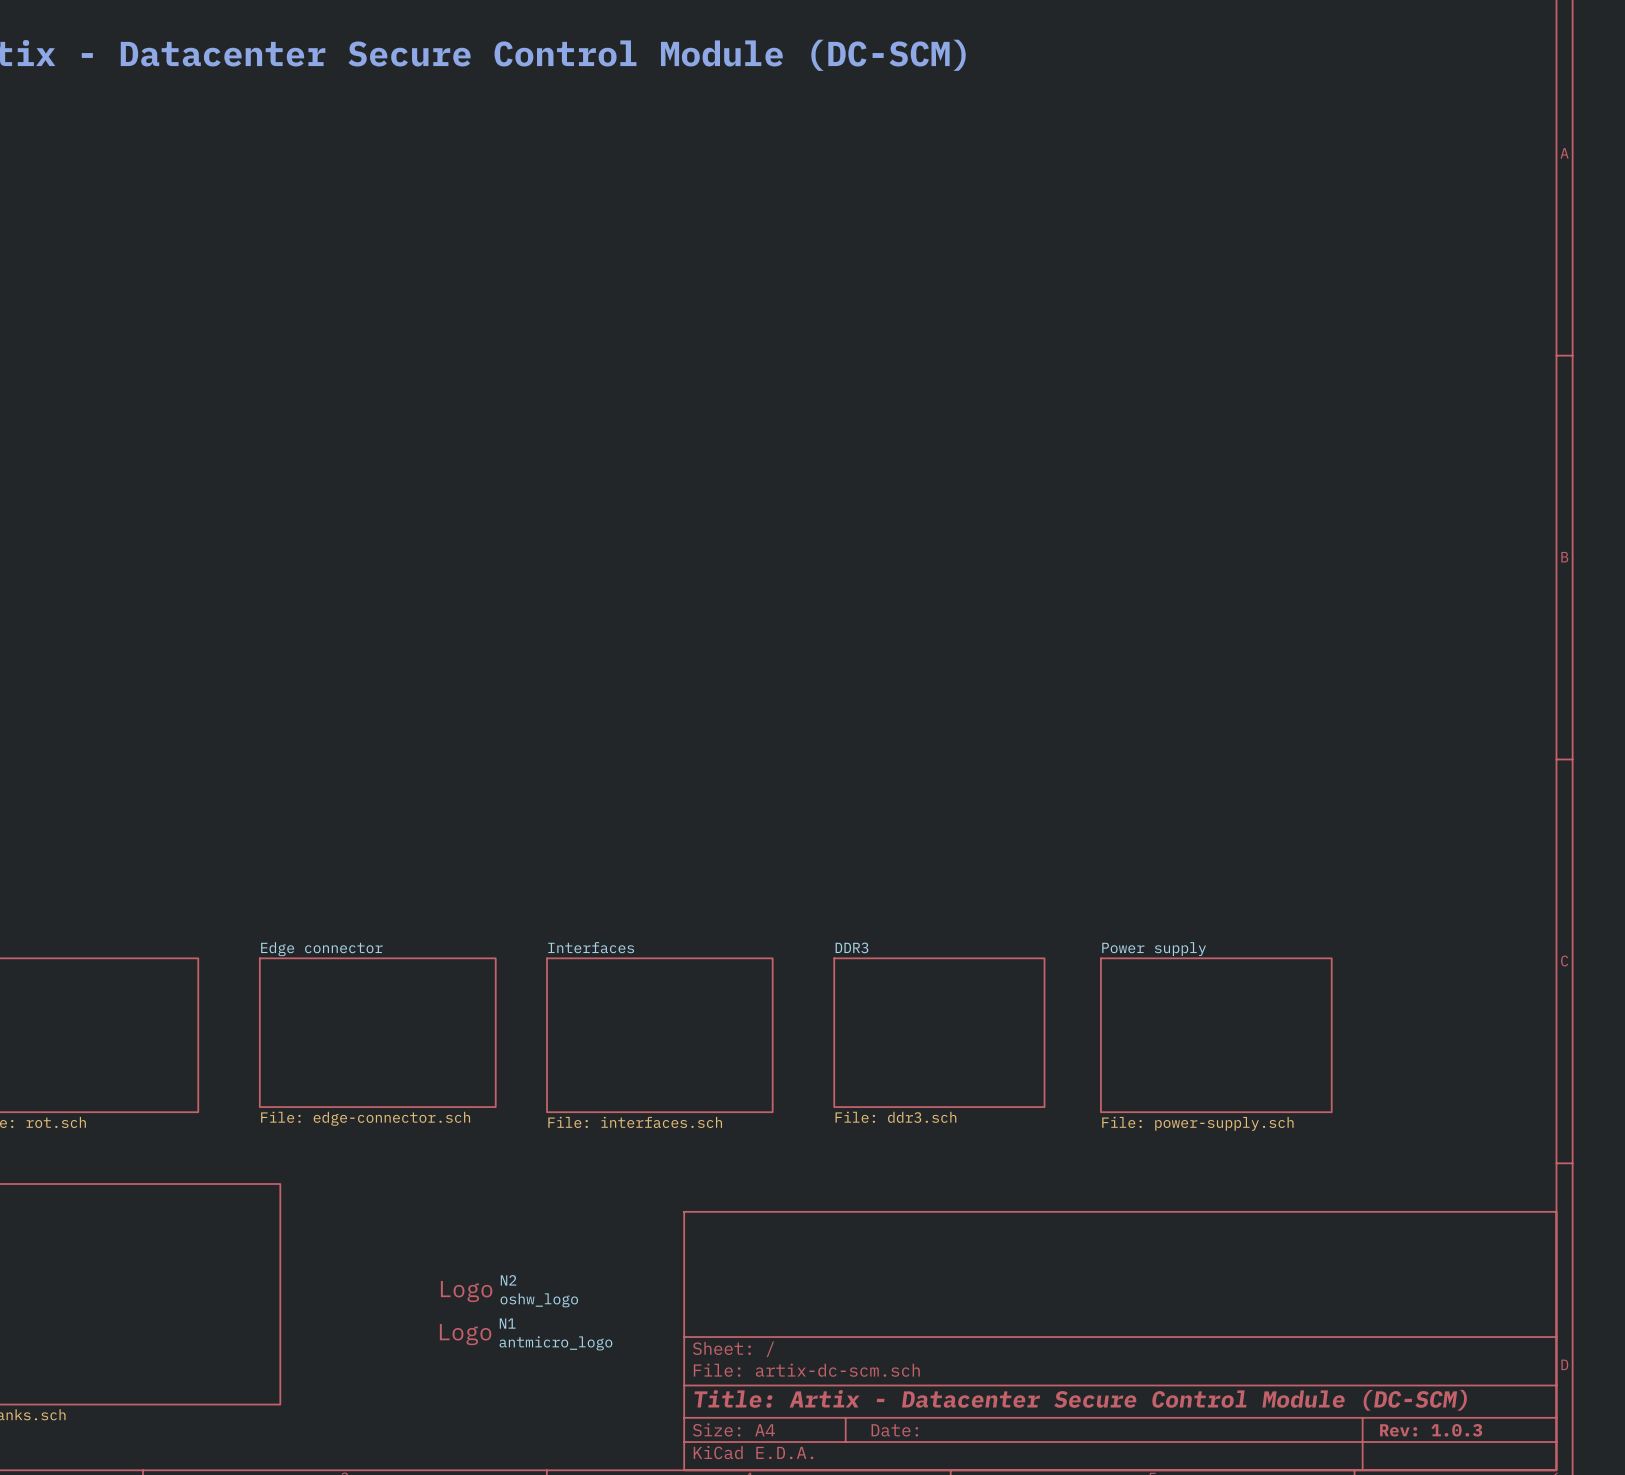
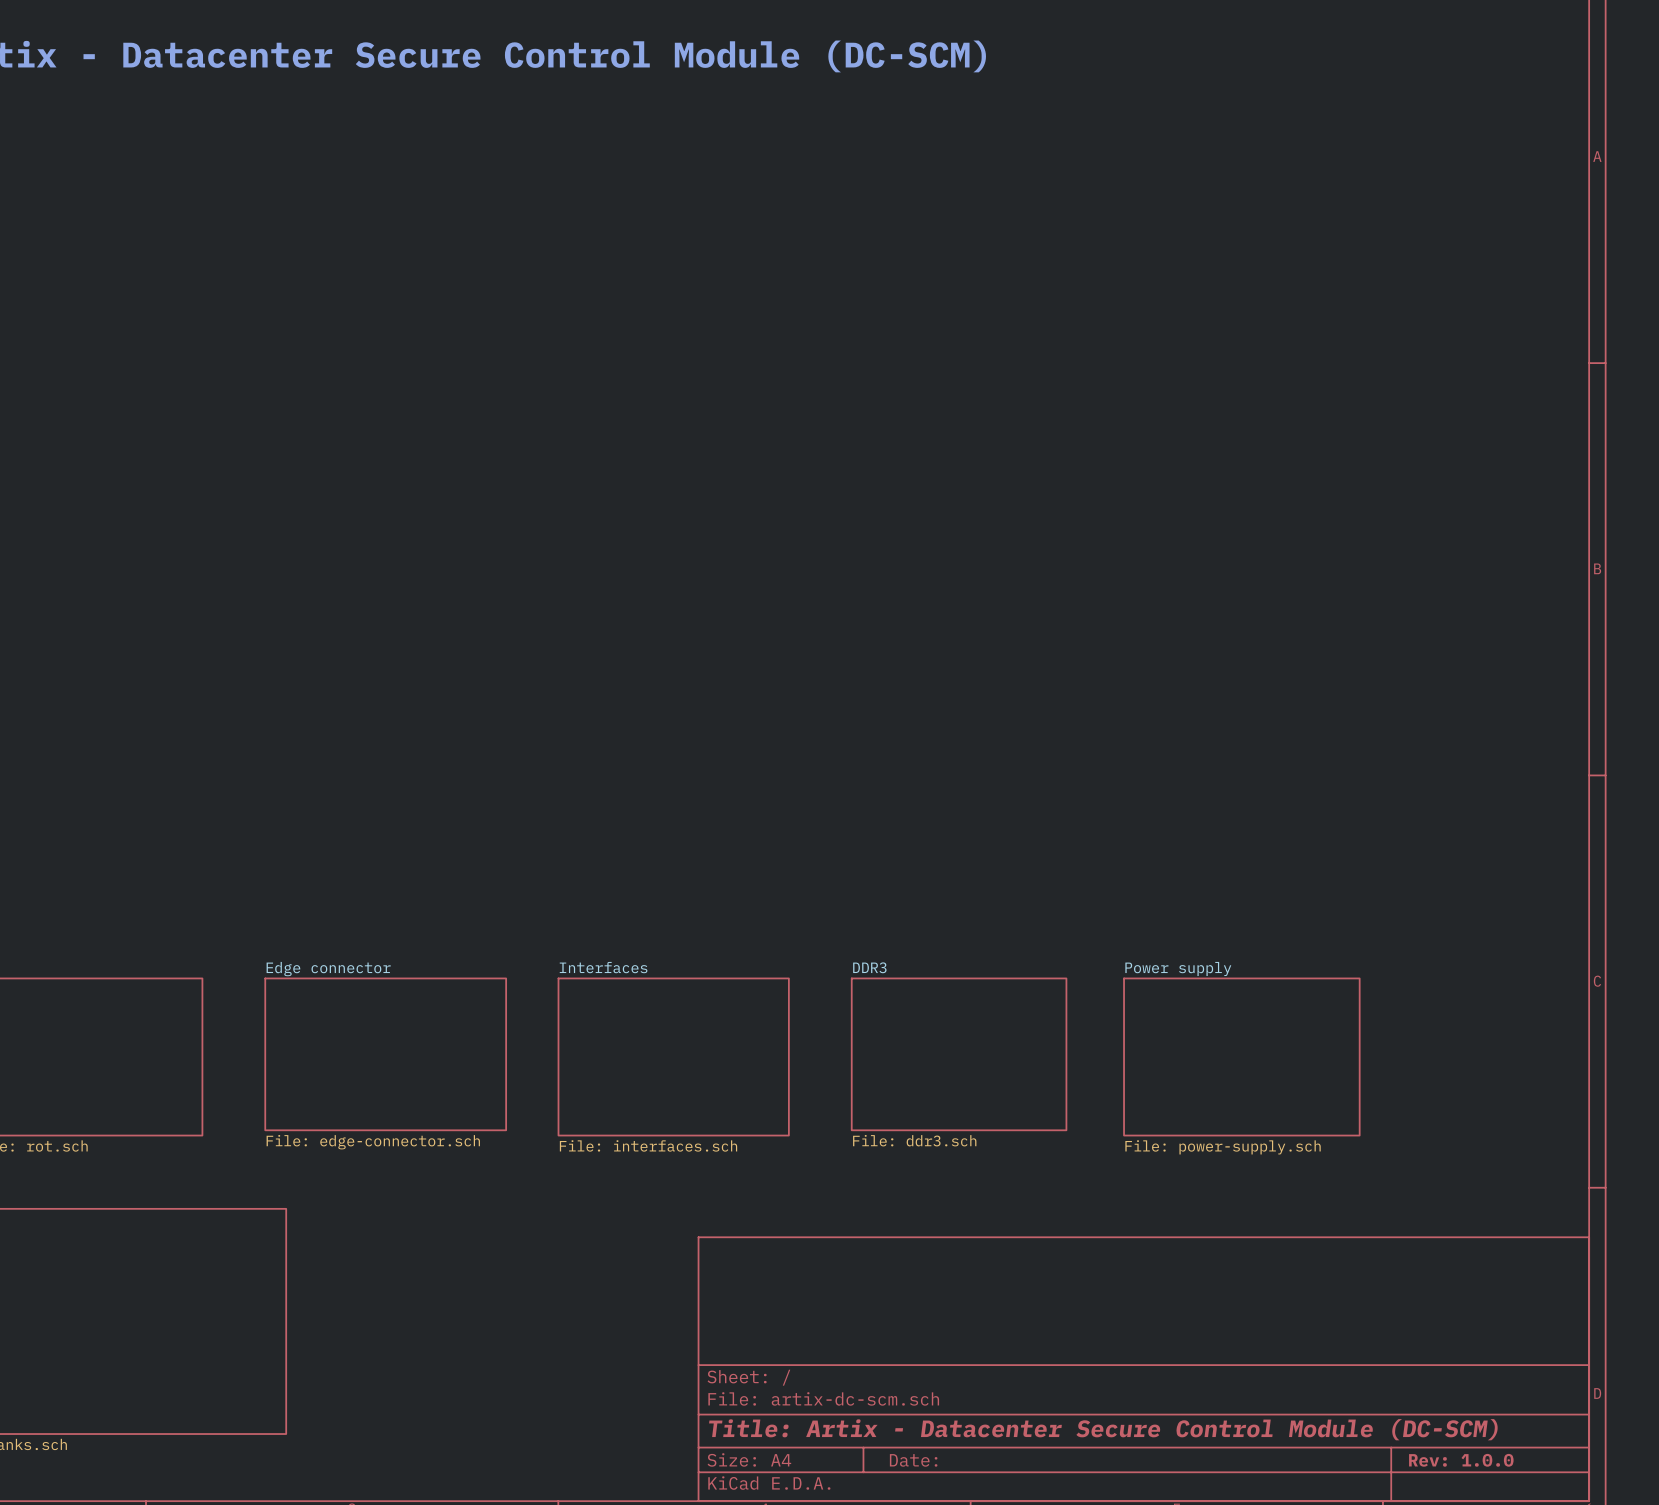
N2: oshw_logo (509, 1291) -> none
N1: antmicro_logo (526, 1334) -> none
title block: Rev: 1.0.3 (1431, 1430) -> Rev: 1.0.0 (1461, 1460)

